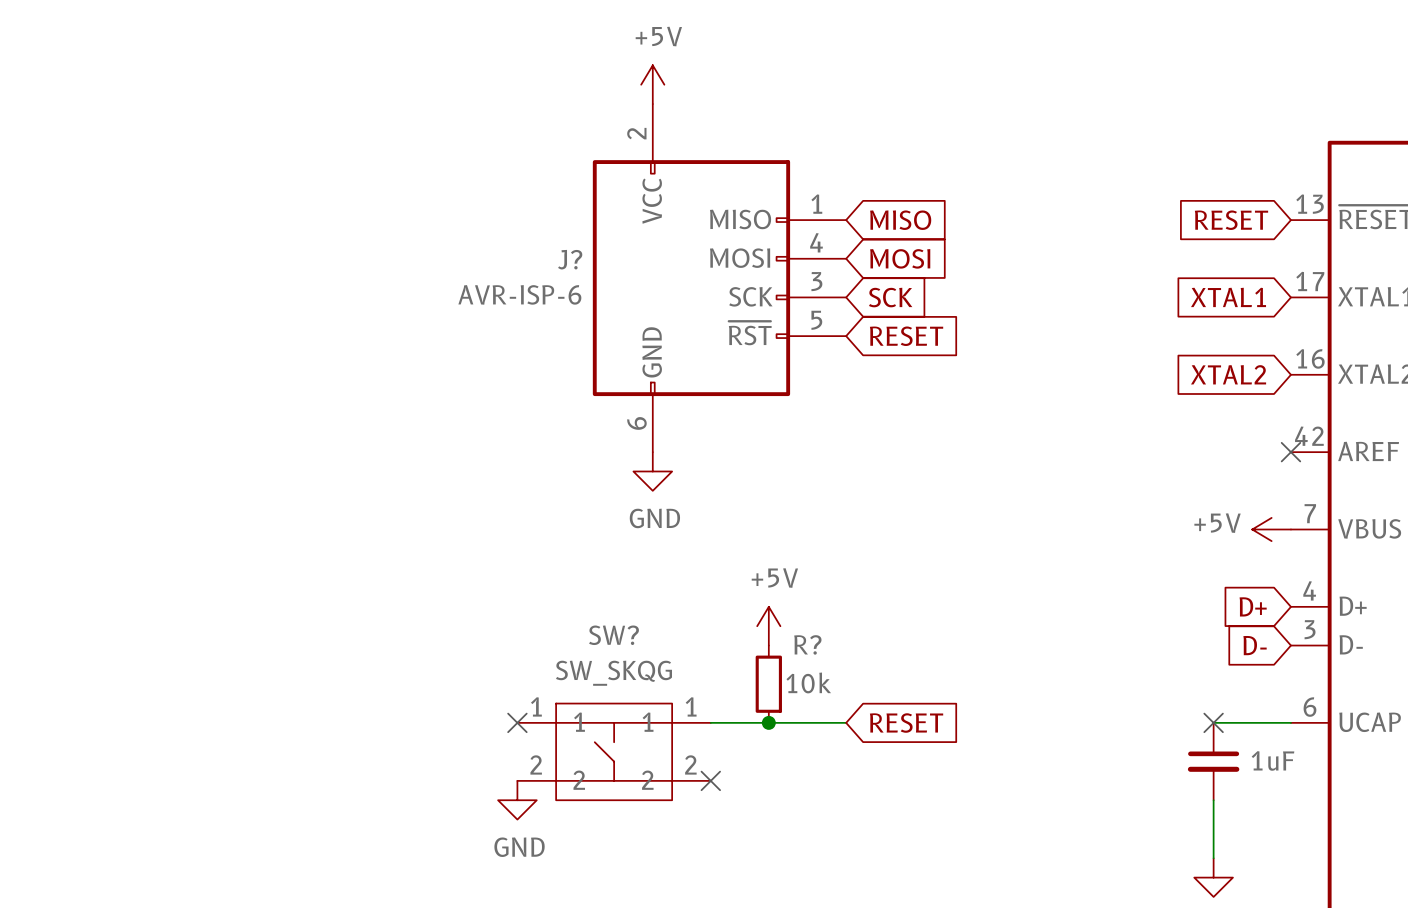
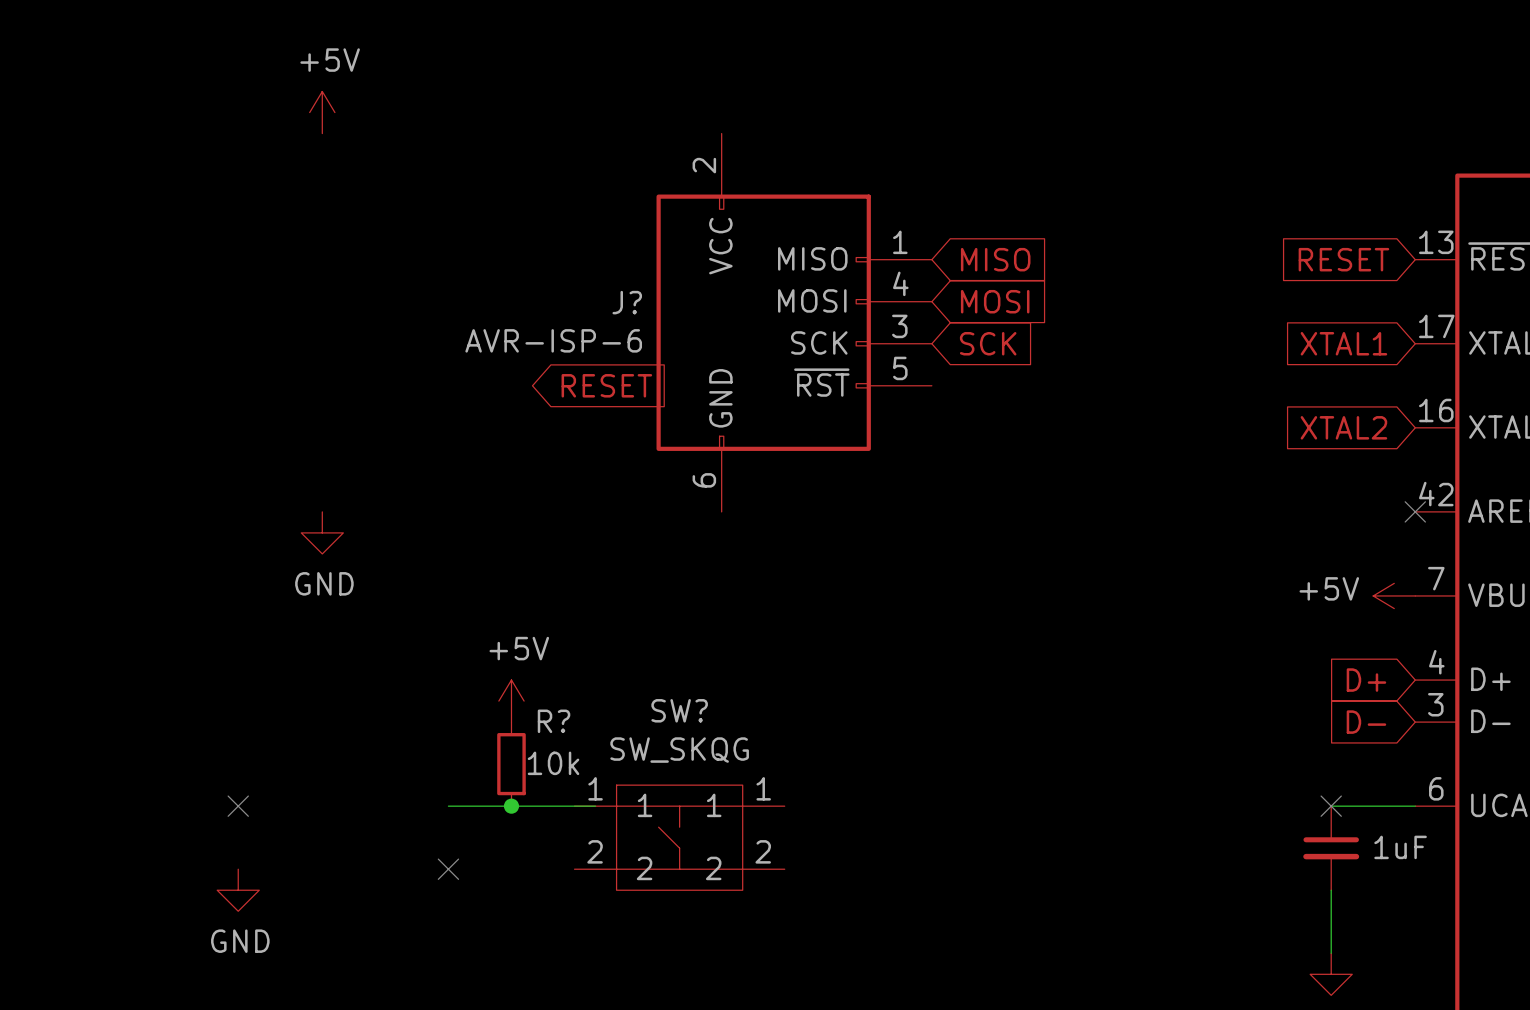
power symbol: none -> +5V (322, 112)
power symbol: +5V (652, 84) -> none
global label: none -> RESET (606, 385)
global label: RESET (906, 336) -> none
power symbol: none -> GND (322, 532)
power symbol: GND (652, 471) -> none
power symbol: none -> +5V (511, 701)
power symbol: +5V (768, 626) -> none
R? position: (768, 684) -> (511, 764)
no-connect mark: none -> (238, 806)
junction: none -> (511, 806)
no-connect mark: (517, 722) -> none
wire: (710, 722) (846, 722) -> (448, 806) (595, 806)
junction: (768, 722) -> none
global label: RESET (906, 723) -> none
no-connect mark: none -> (448, 869)
no-connect mark: (710, 780) -> none
power symbol: none -> GND (238, 890)
power symbol: GND (517, 800) -> none

